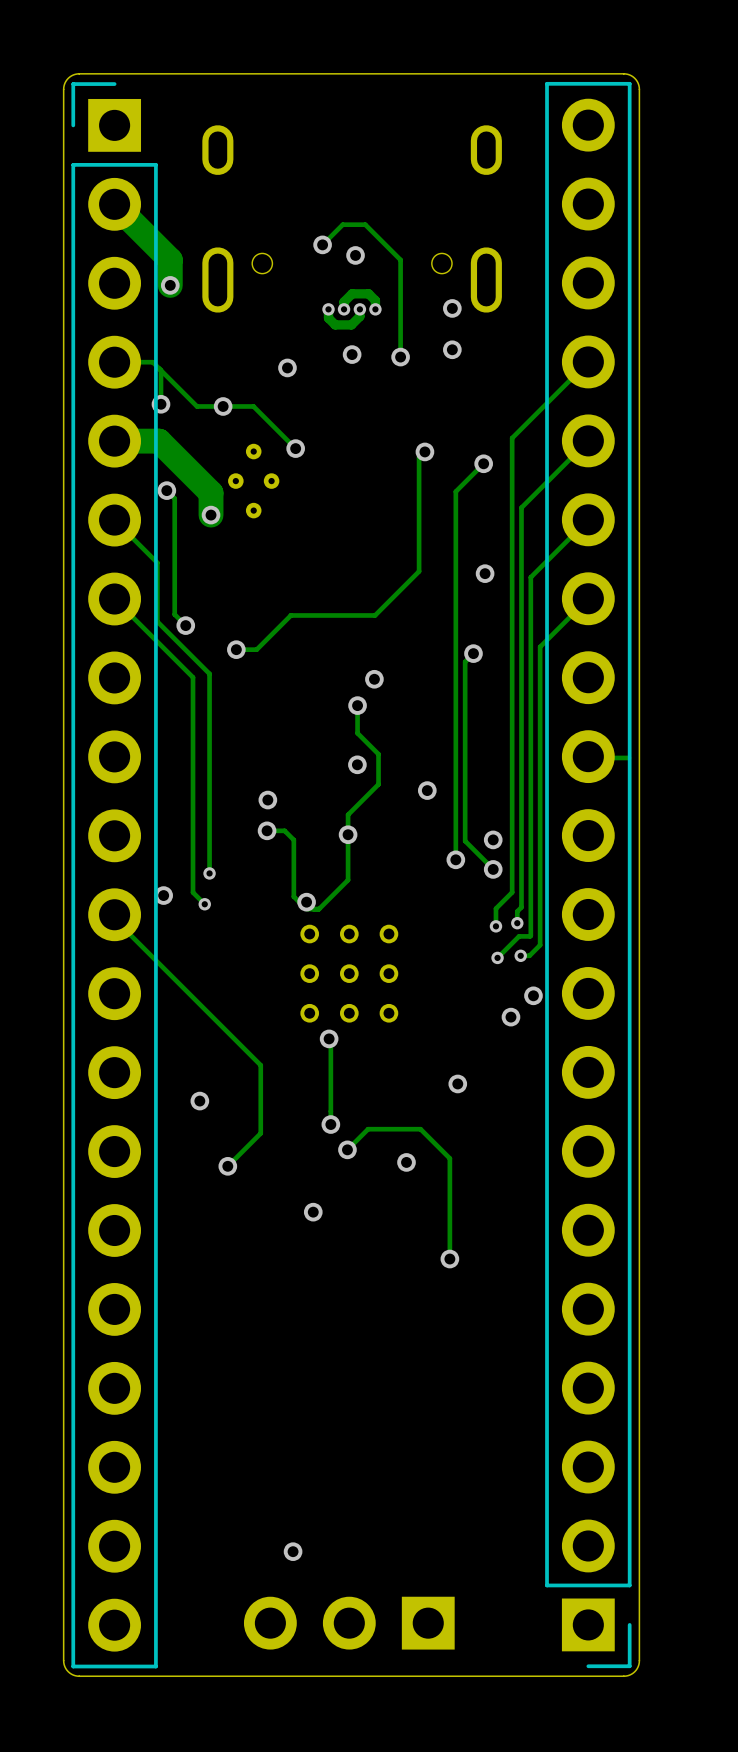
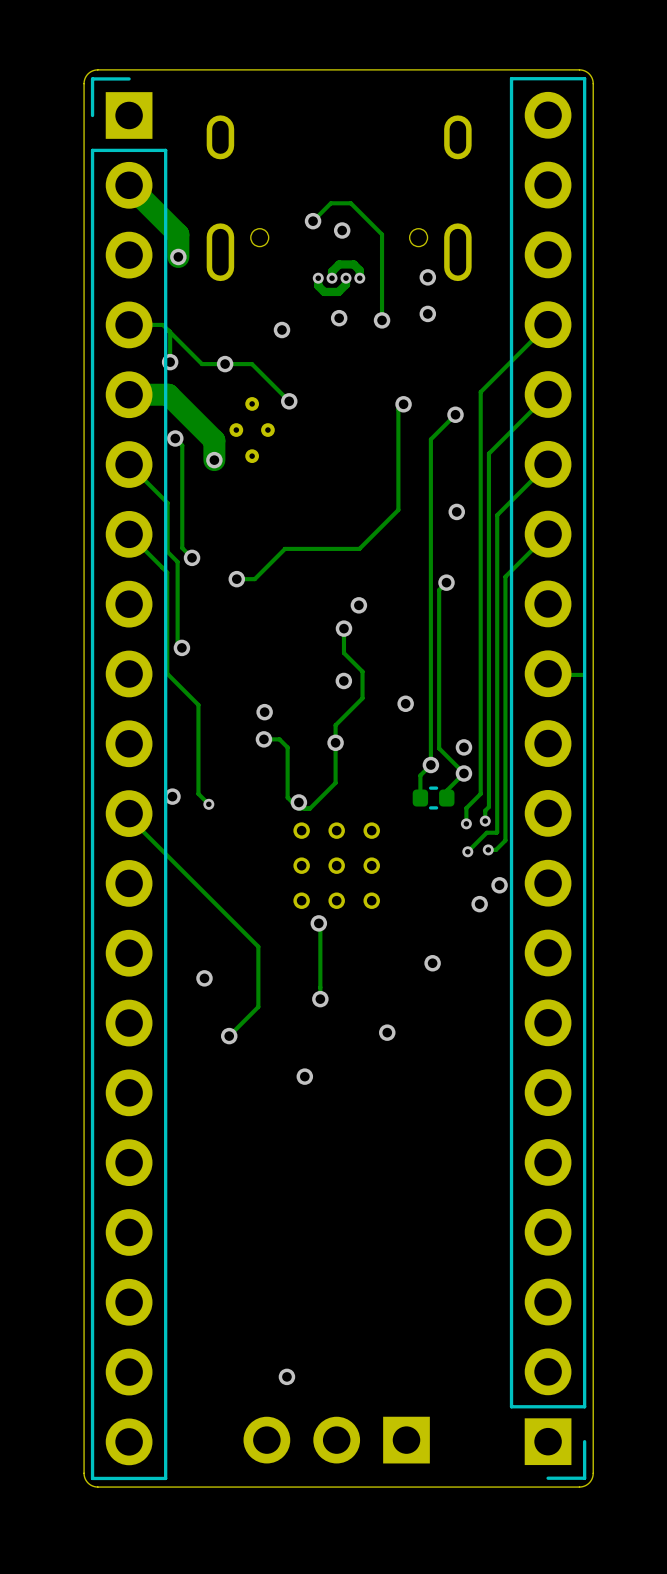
track: (157, 562) (157, 621) (209, 673) (209, 873) -> (166, 502) (167, 551) (177, 561) (177, 643) (181, 647)
track: (157, 642) (193, 677) (193, 791) -> (167, 572) (167, 673) (198, 704)
via: none -> (181, 647)
track: none -> (430, 765) (420, 775) (420, 798)
track: none -> (463, 773) (446, 790) (446, 798)
via: (209, 873) -> none
part: none -> (433, 798)
track: (347, 1149) (368, 1129) (420, 1129) (449, 1158) (449, 1259) -> none
via: (347, 1149) -> none
via: (449, 1259) -> none

